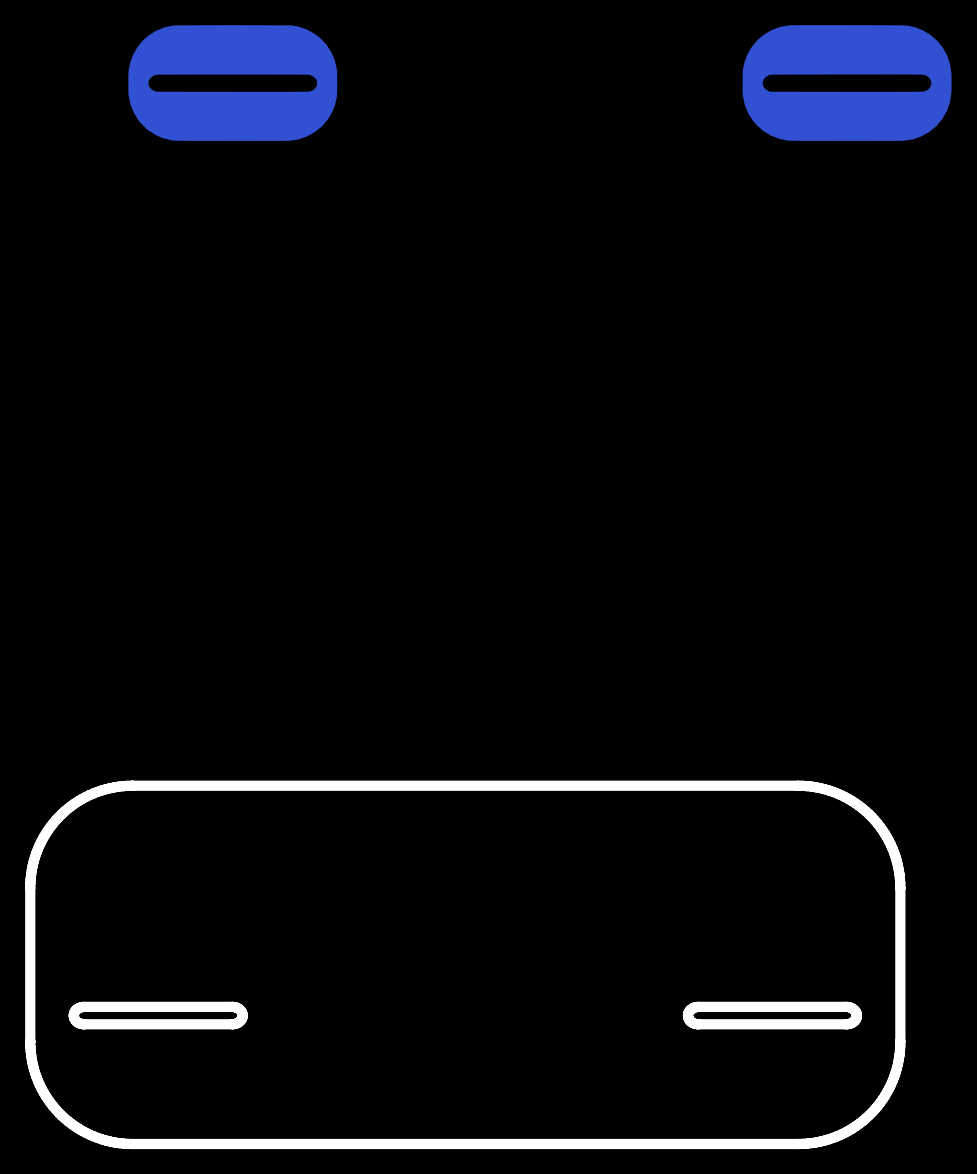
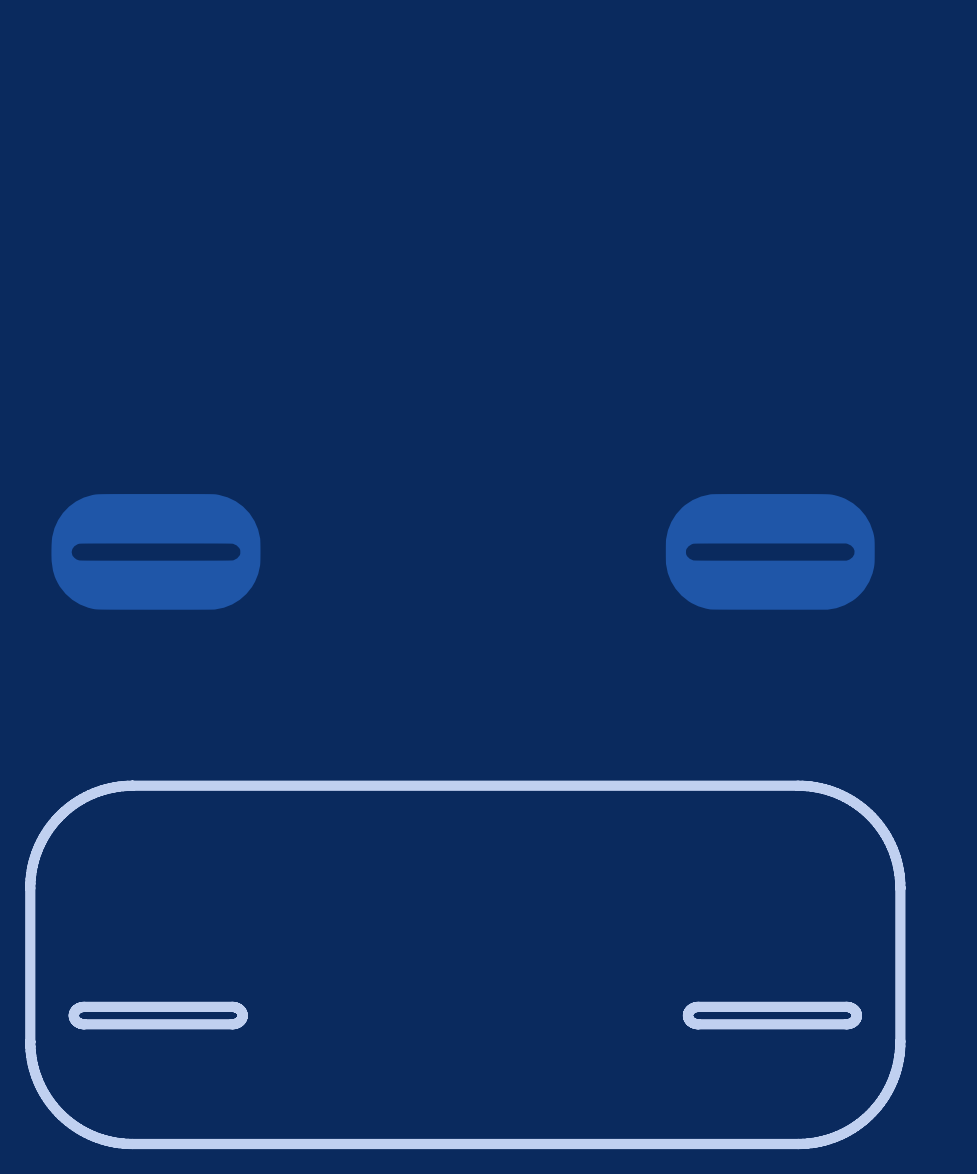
drawing: [128, 25, 952, 141] -> none
drawing: none -> [51, 494, 875, 610]

